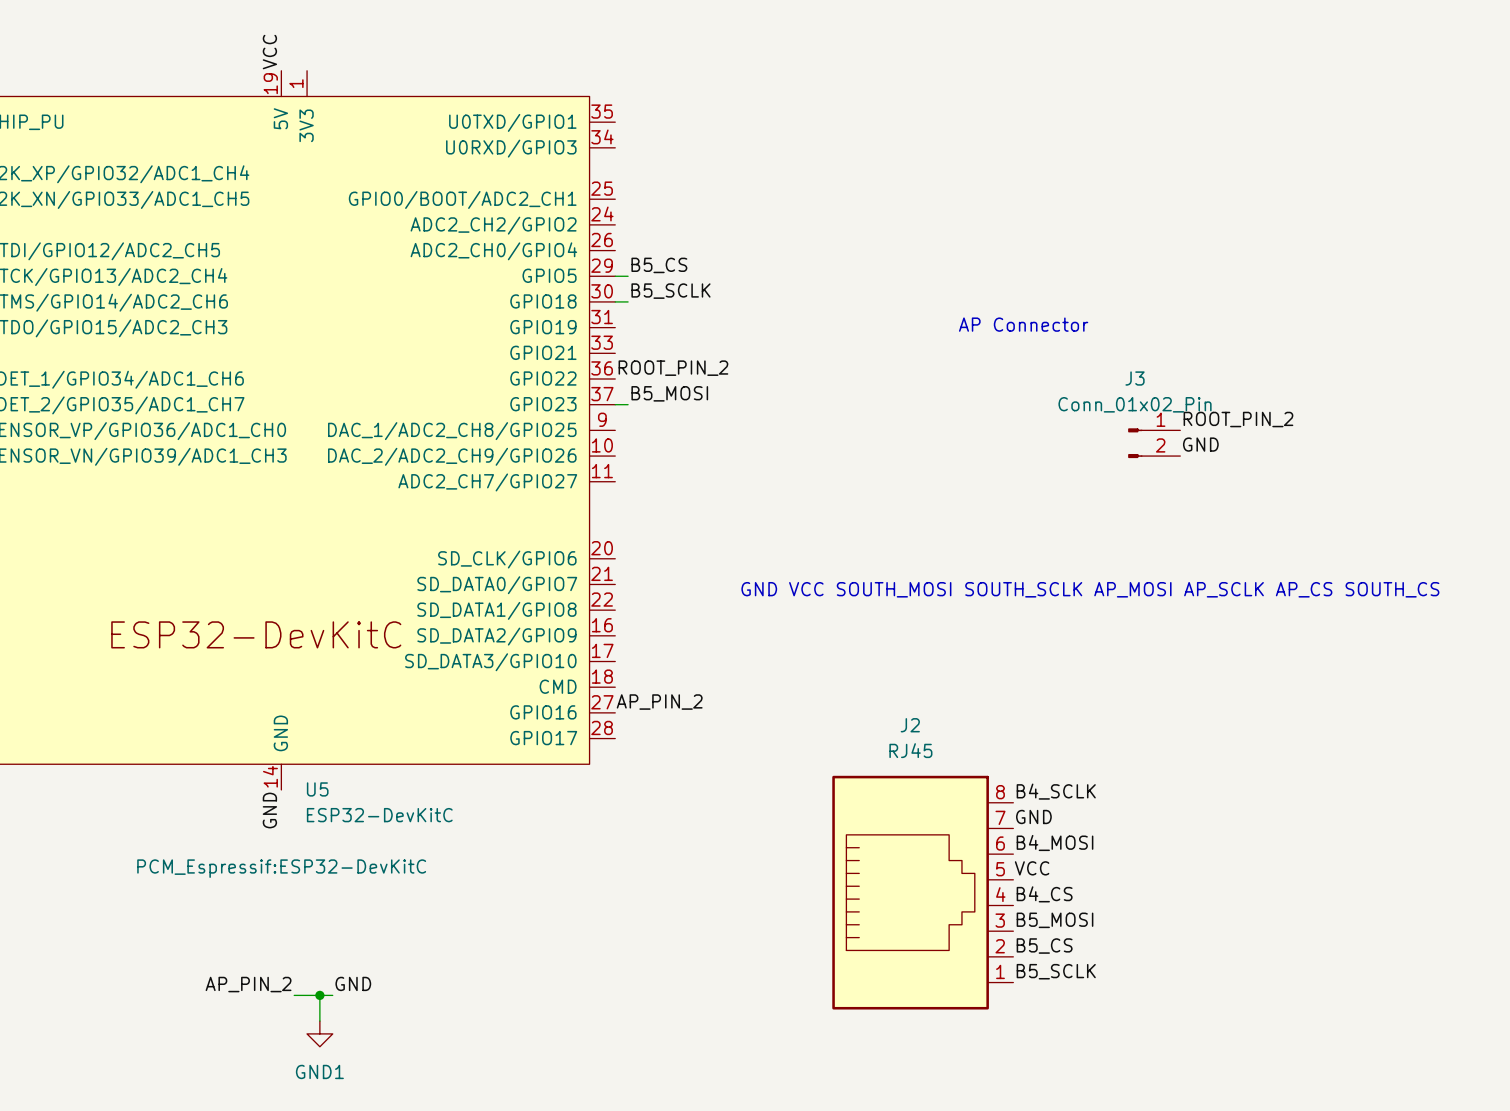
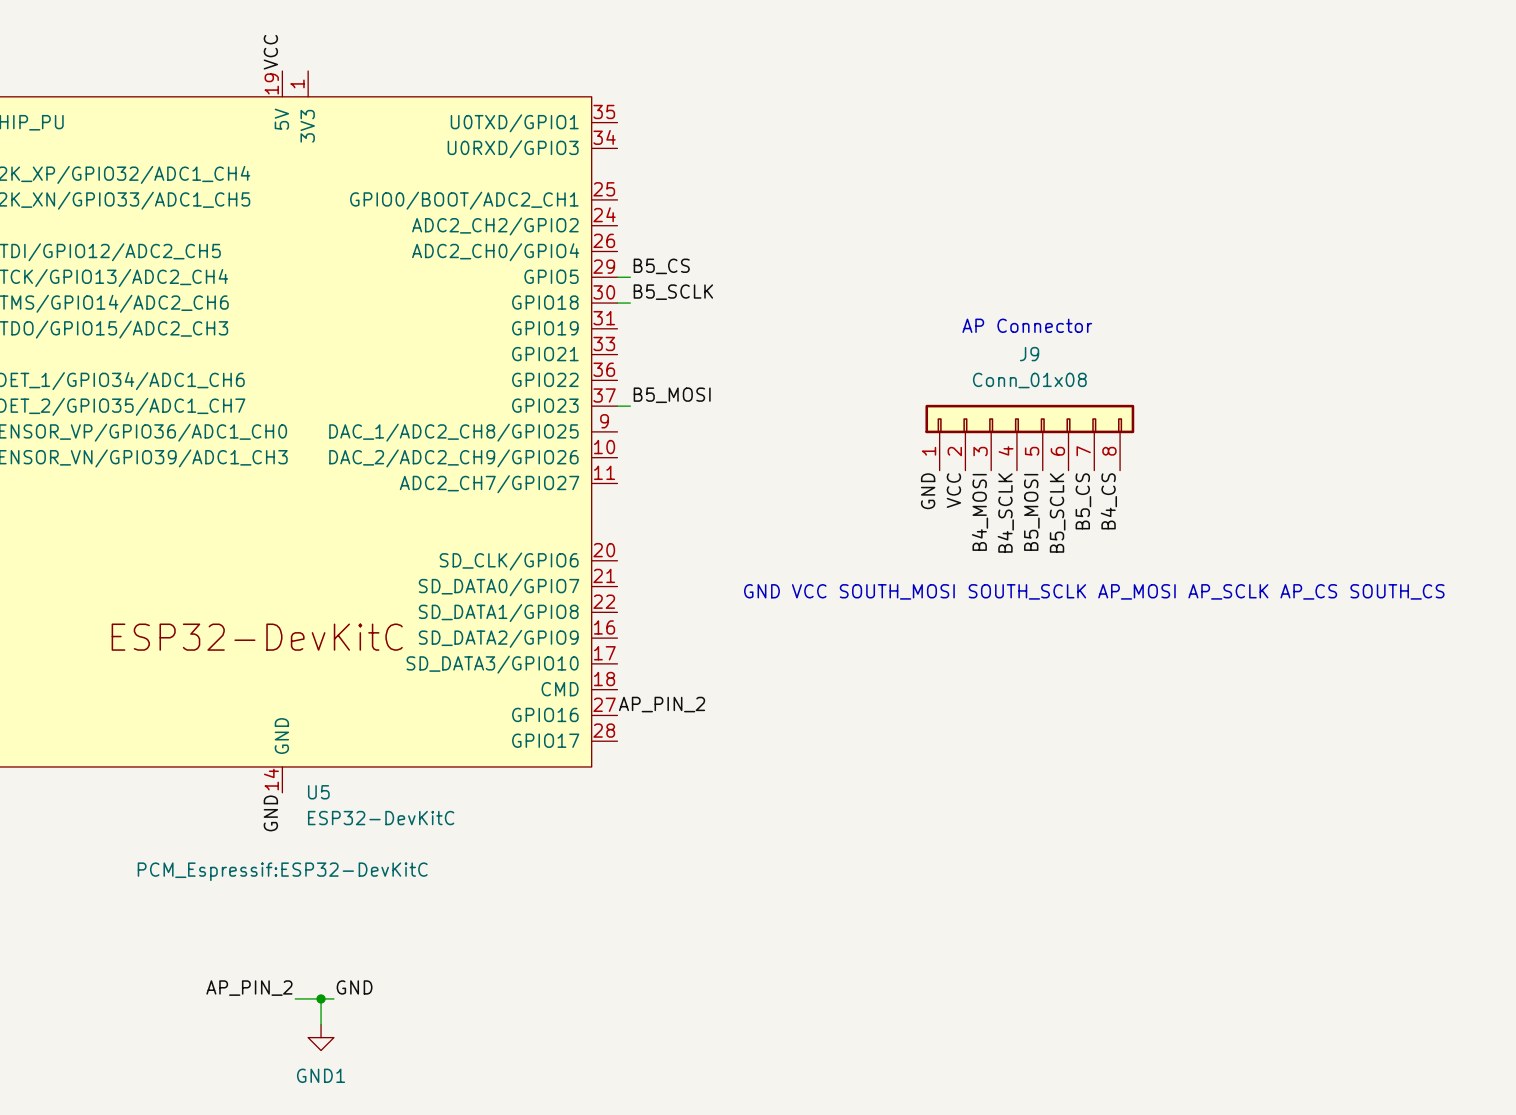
label: ROOT_PIN_2 (673, 368) -> none
label: ROOT_PIN_2 (1238, 419) -> none
J9: none -> Conn_01x08 (1029, 437)
J3: Conn_01x02_Pin (1154, 443) -> none
label: GND (1200, 444) -> none
label: none -> VCC (953, 490)
label: none -> GND (928, 491)
label: none -> B5_CS (1083, 501)
label: none -> B4_CS (1108, 501)
label: none -> B4_MOSI (979, 512)
label: none -> B5_MOSI (1031, 512)
label: none -> B4_SCLK (1005, 513)
label: none -> B5_SCLK (1057, 513)
label: B4_SCLK (1056, 791) -> none
label: GND (1033, 816) -> none
label: B4_MOSI (1055, 842) -> none
label: VCC (1032, 868) -> none
J2: RJ45 (922, 892) -> none
label: B4_CS (1044, 894) -> none
label: B5_MOSI (1055, 920) -> none
label: B5_CS (1044, 946) -> none
label: B5_SCLK (1056, 971) -> none

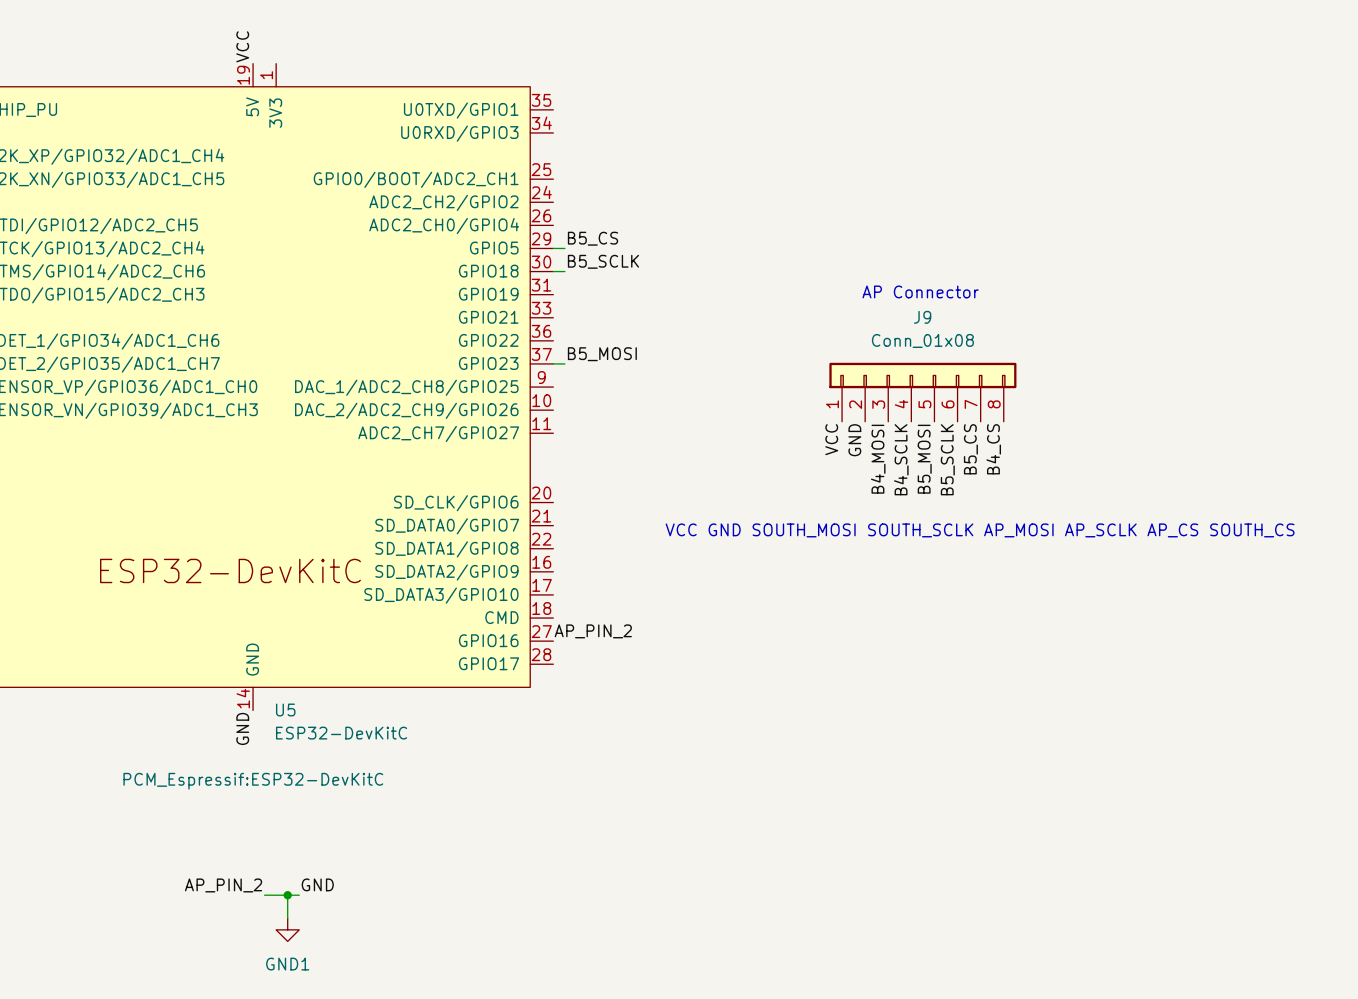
label: VCC (953, 490) -> GND (854, 440)
label: GND (928, 491) -> VCC (831, 439)
text: GND VCC SOUTH_MOSI SOUTH_SCLK AP_MOSI AP_SCLK AP_CS SOUTH_CS (1094, 591) -> VCC GND SOUTH_MOSI SOUTH_SCLK AP_MOSI AP_SCLK AP_CS SOUTH_CS (980, 530)

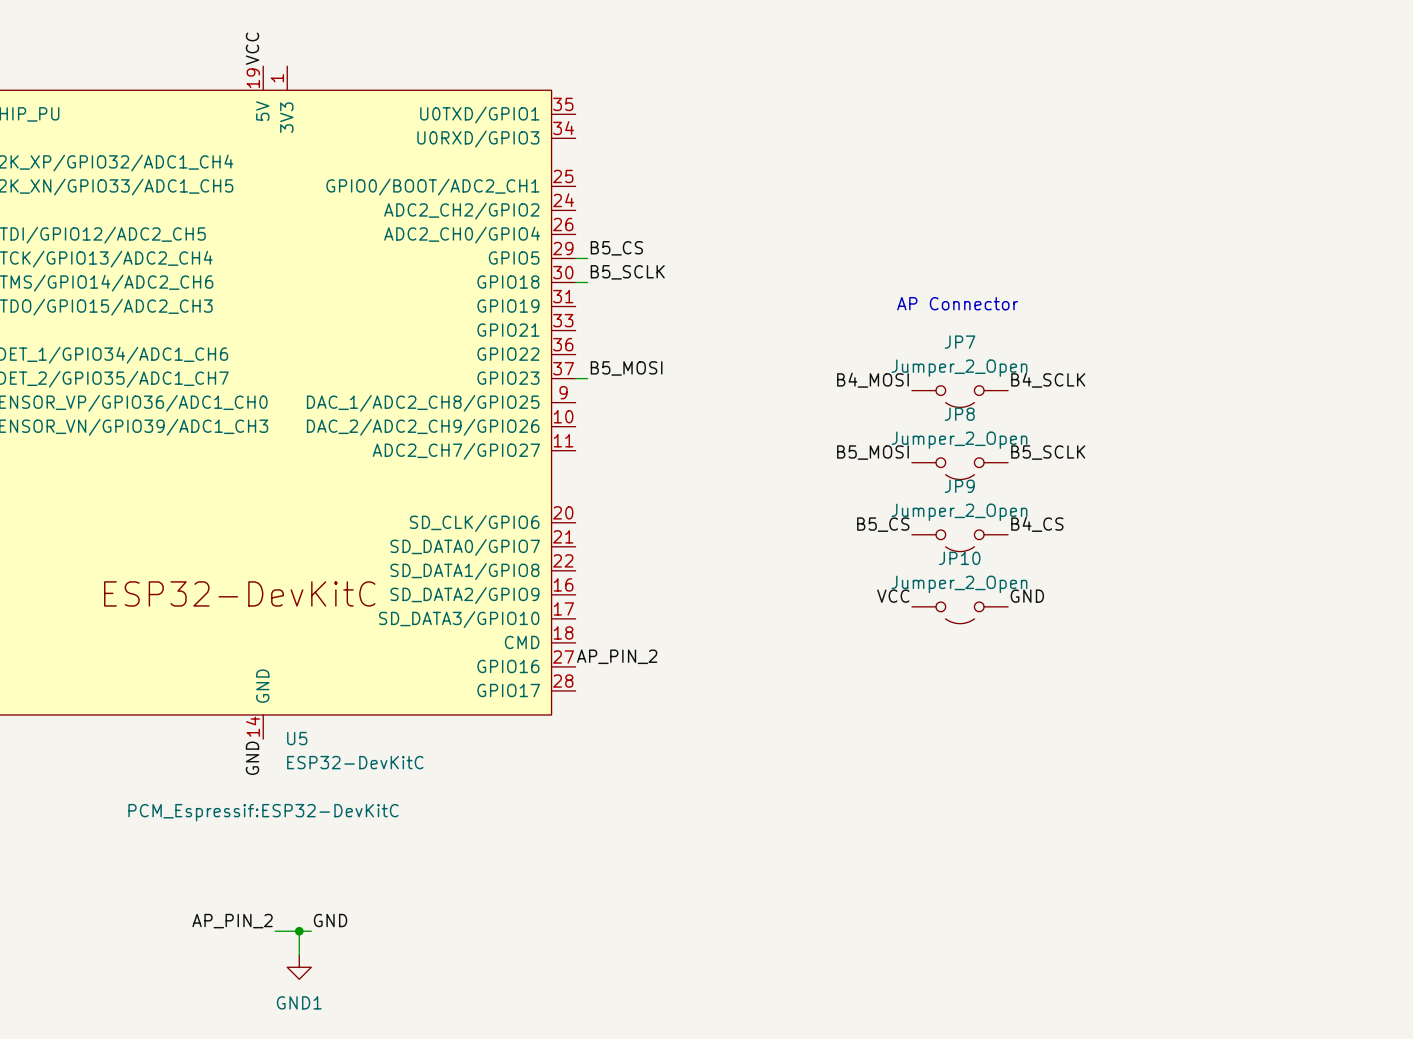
JP7: none -> Jumper_2_Open (960, 396)
J9: Conn_01x08 (922, 392) -> none
label rotation: 0° (831, 439) -> 90° clockwise (893, 596)
label position: VCC (831, 439) -> VCC (893, 596)
label rotation: 0° (854, 440) -> 90° clockwise (1027, 596)
label position: GND (854, 440) -> GND (1027, 596)
label rotation: 0° (970, 449) -> 90° clockwise (883, 524)
label position: B5_CS (970, 449) -> B5_CS (883, 524)
label rotation: 0° (993, 449) -> 90° clockwise (1037, 524)
JP8: none -> Jumper_2_Open (960, 468)
label rotation: 0° (878, 459) -> 90° clockwise (872, 380)
label position: B4_MOSI (878, 459) -> B4_MOSI (872, 380)
label rotation: 0° (901, 459) -> 90° clockwise (1048, 380)
label position: B4_SCLK (901, 459) -> B4_SCLK (1048, 380)
label rotation: 0° (924, 459) -> 90° clockwise (872, 452)
label position: B5_MOSI (924, 459) -> B5_MOSI (872, 452)
label rotation: 0° (947, 459) -> 90° clockwise (1048, 452)
JP9: none -> Jumper_2_Open (960, 540)
text: VCC GND SOUTH_MOSI SOUTH_SCLK AP_MOSI AP_SCLK AP_CS SOUTH_CS (980, 530) -> none
JP10: none -> Jumper_2_Open (960, 612)

